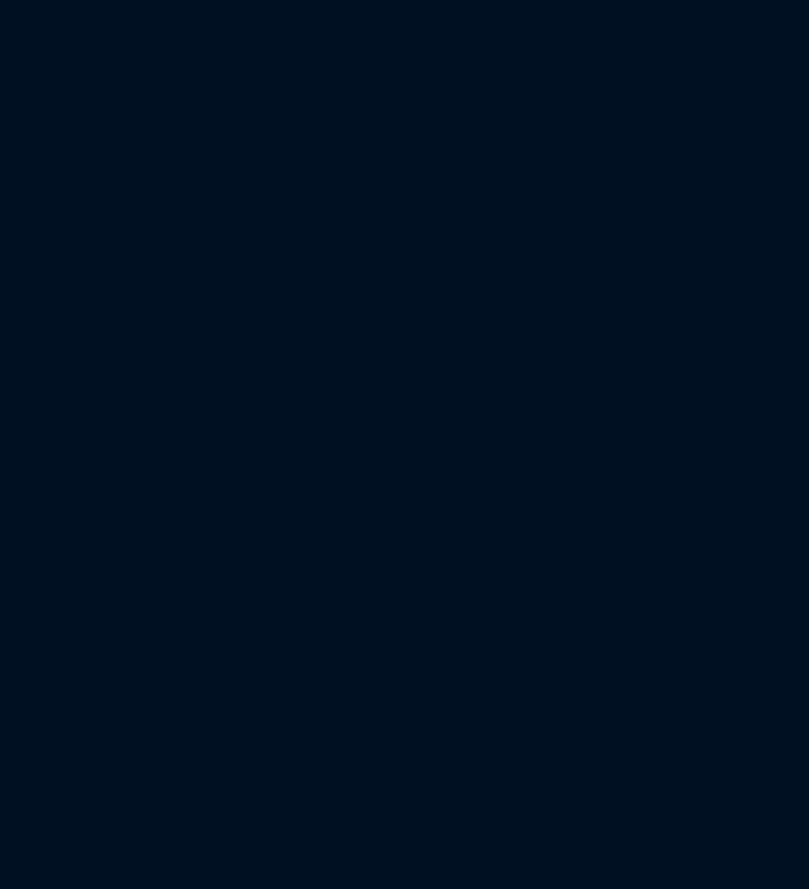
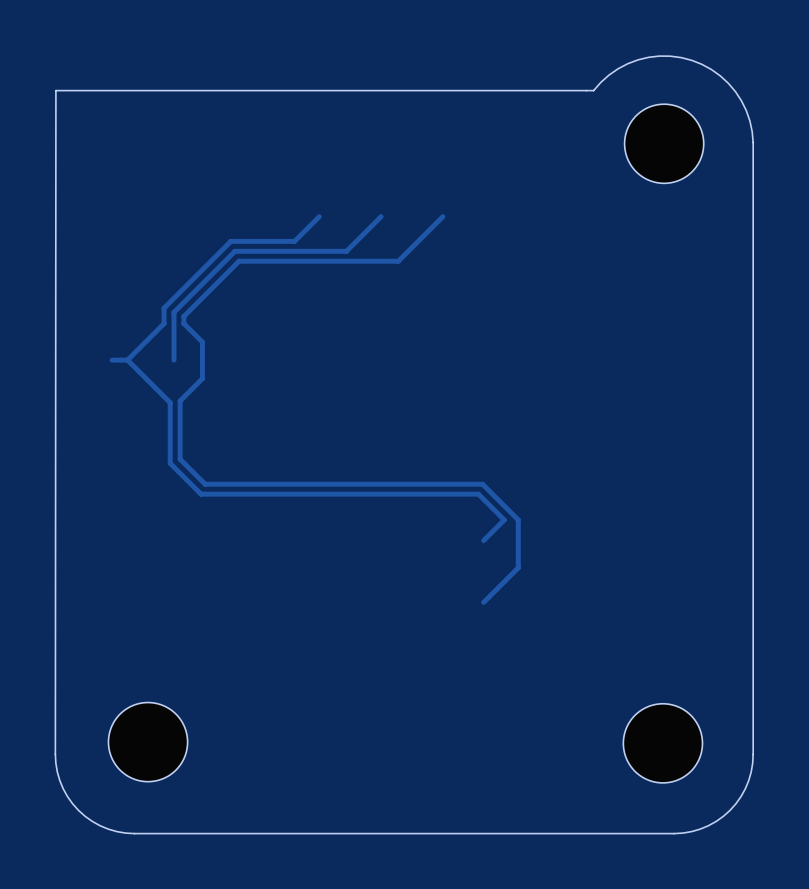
board edge: none -> (55, 90) (593, 90) (617, 68) (637, 59) (659, 56) (681, 57) (701, 64) (728, 83) (746, 110) (753, 142) (753, 754) (751, 772) (745, 788) (730, 810) (708, 825) (691, 831) (674, 833) (134, 833) (116, 831) (100, 825) (78, 810) (63, 788) (57, 772) (55, 754) (55, 90)
part: none -> (664, 143)
track: none -> (319, 216) (294, 241) (230, 241) (164, 308) (164, 323) (127, 360)
track: none -> (381, 216) (346, 251) (234, 251) (173, 312) (173, 360)
track: none -> (442, 216) (398, 261) (239, 261) (183, 316) (183, 323) (202, 342) (202, 378) (180, 400) (180, 459) (205, 484) (482, 484) (518, 519) (518, 567) (483, 602)
track: none -> (112, 360) (127, 360)
track: none -> (127, 360) (170, 402) (170, 463) (201, 494) (478, 494) (504, 519) (483, 540)
part: none -> (148, 742)
part: none -> (662, 743)

